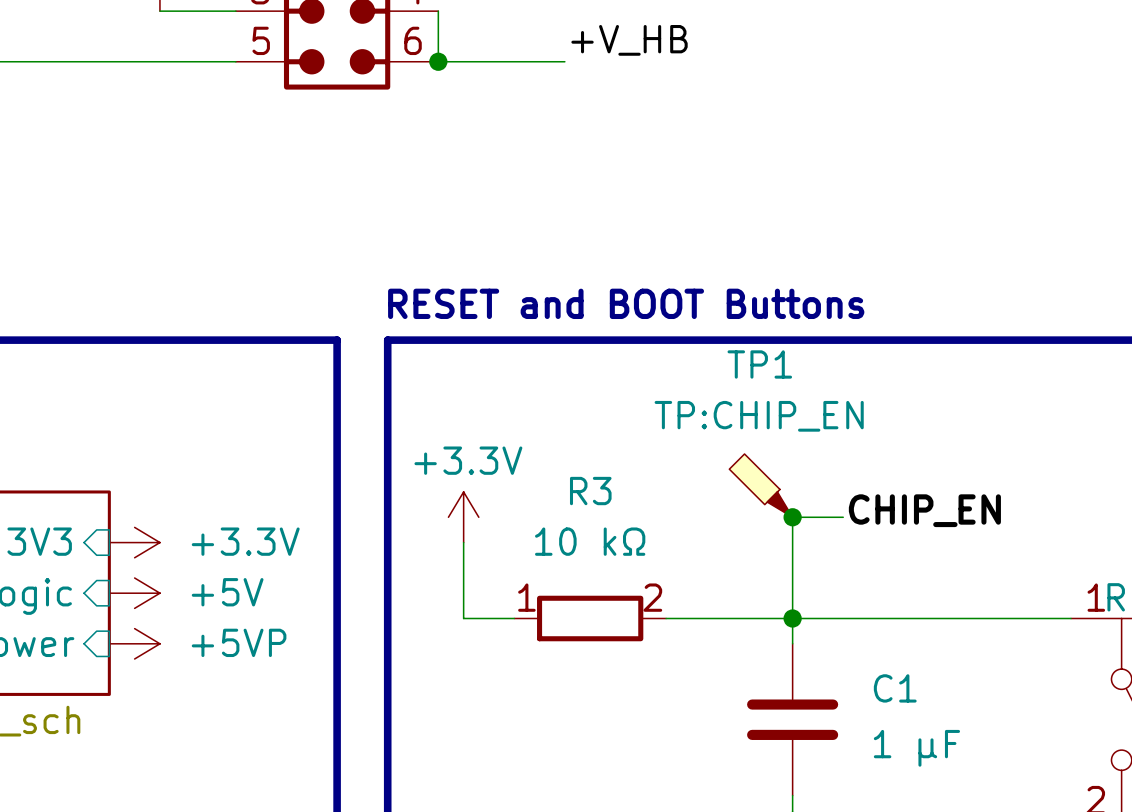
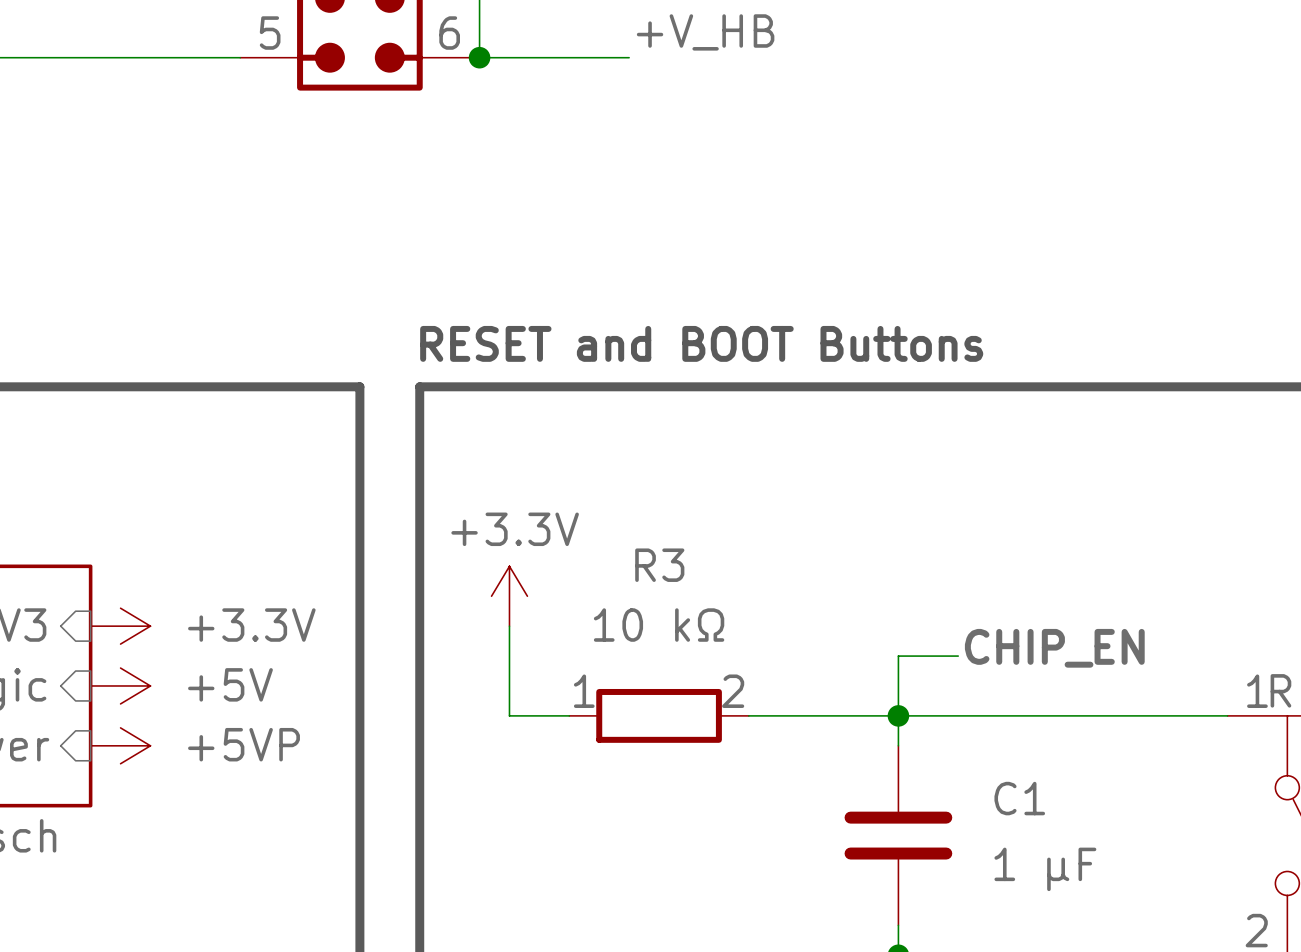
TP1: TP:CHIP_EN (760, 485) -> none
label position: CHIP_EN (924, 510) -> CHIP_EN (1054, 648)
junction: (792, 517) -> none
wire: (843, 517) (792, 517) (792, 567) -> (958, 656) (898, 656)

